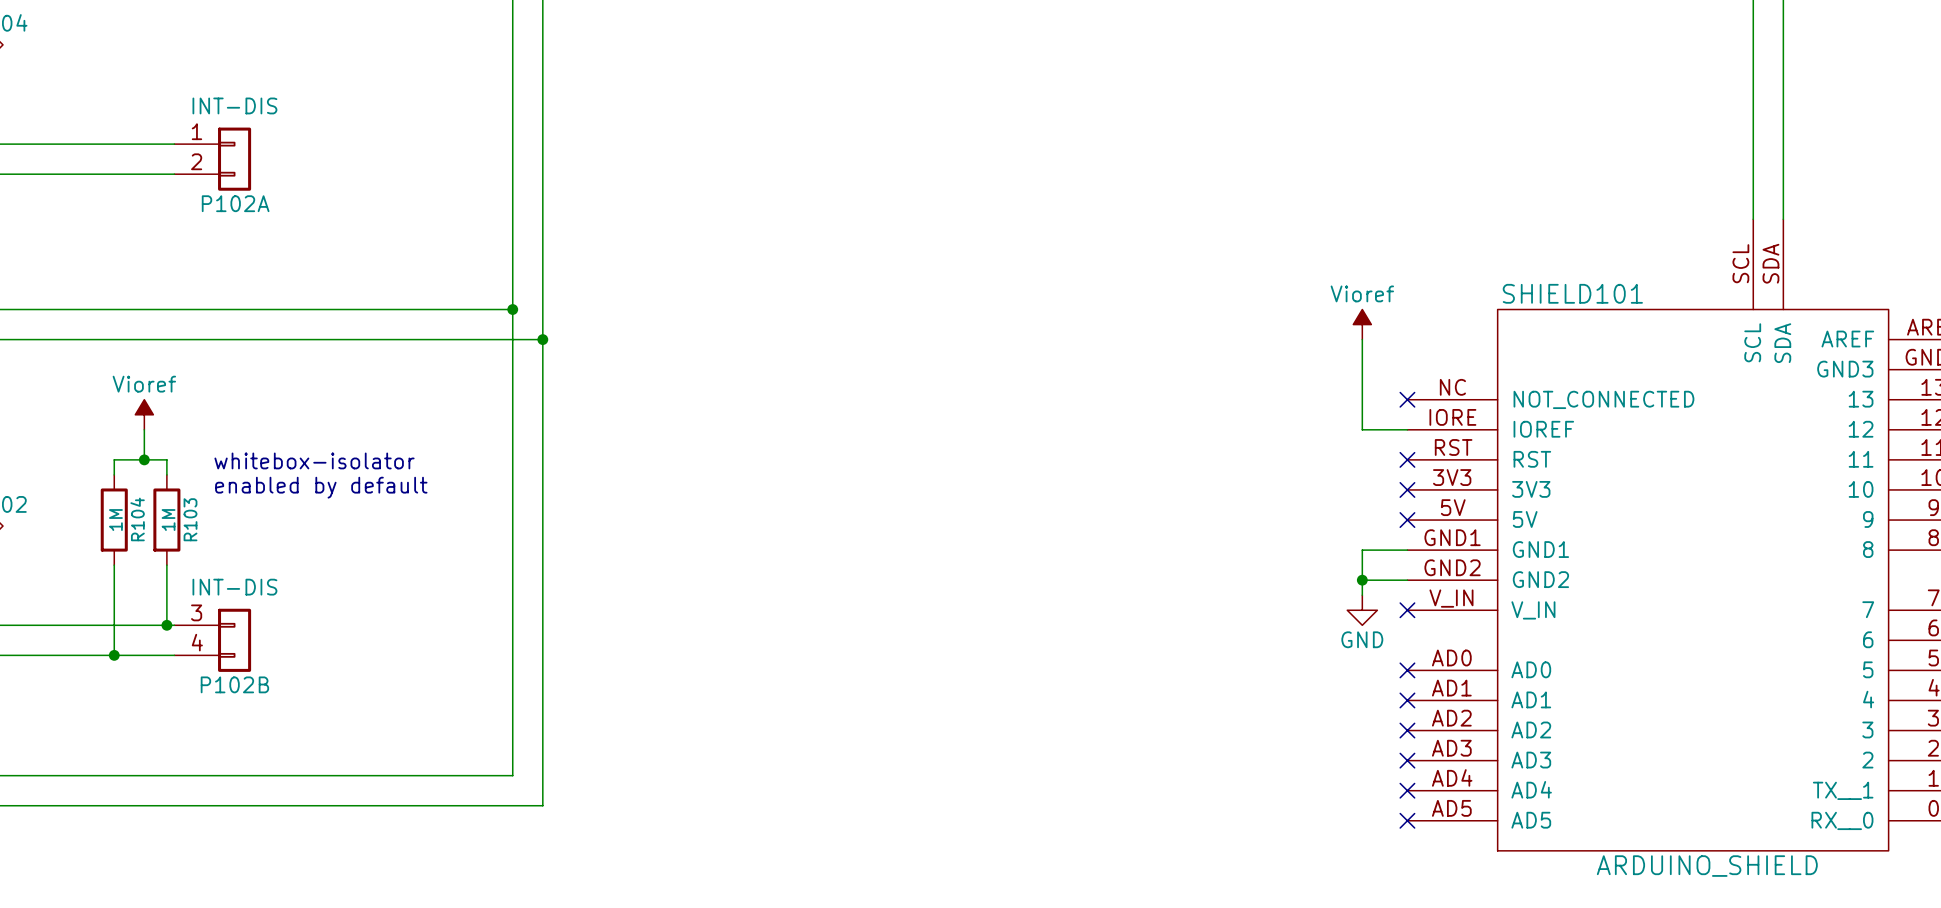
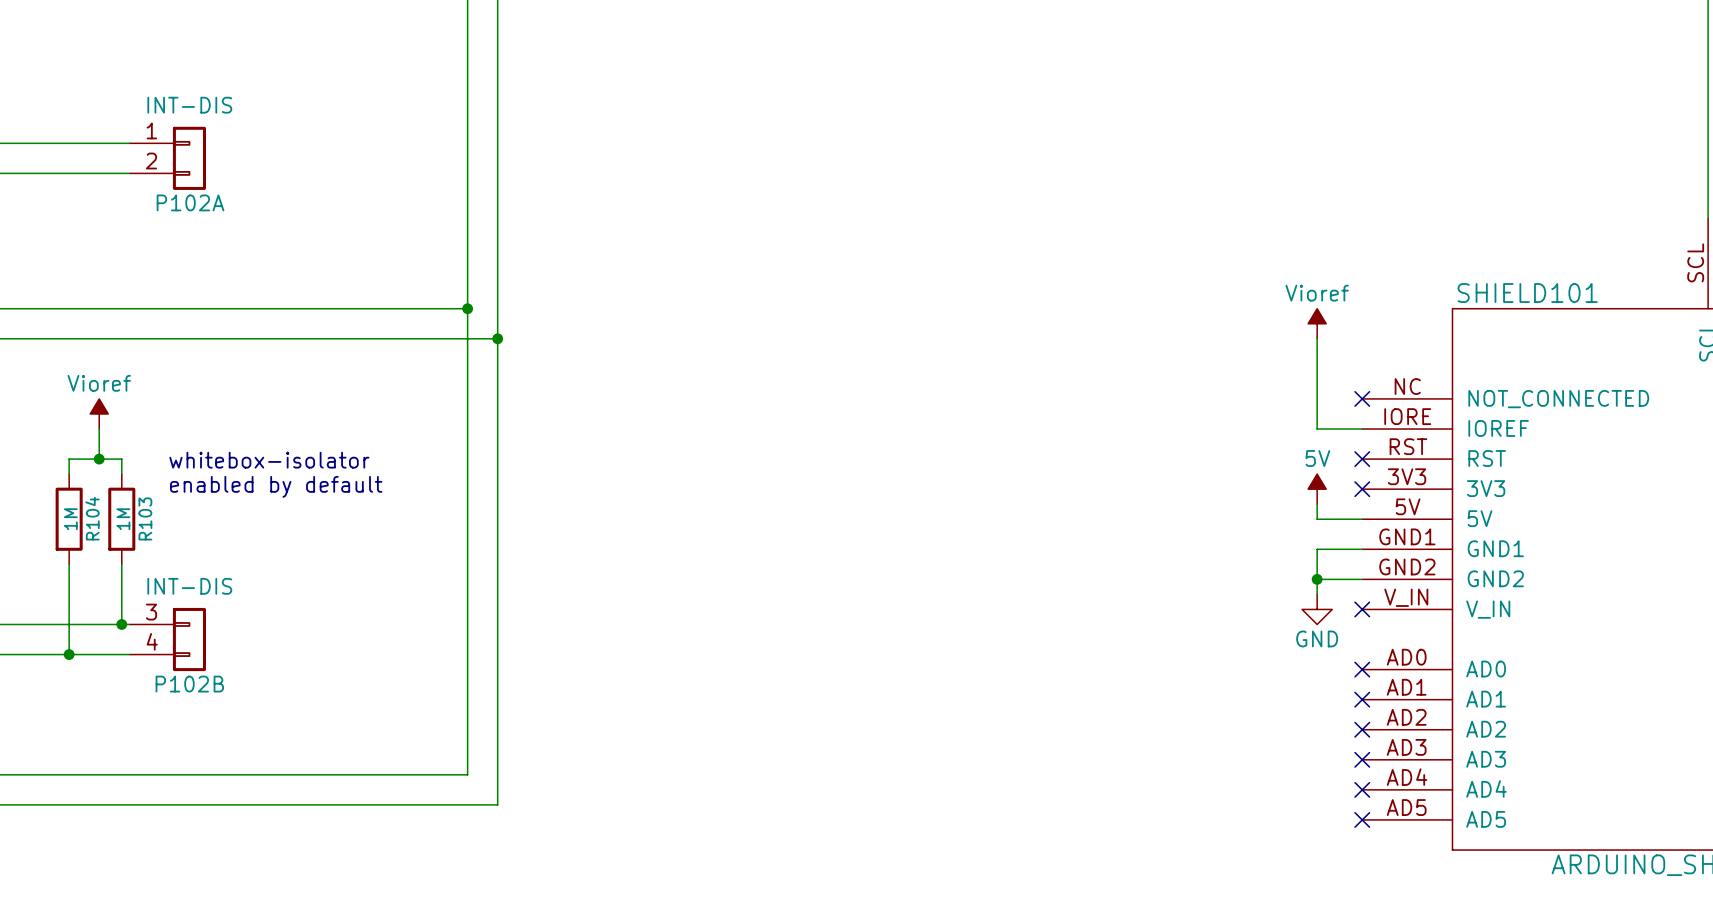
power symbol: none -> 5V (1317, 489)
wire: none -> (1317, 504) (1317, 519) (1362, 519)
no-connect mark: (1407, 520) -> none

